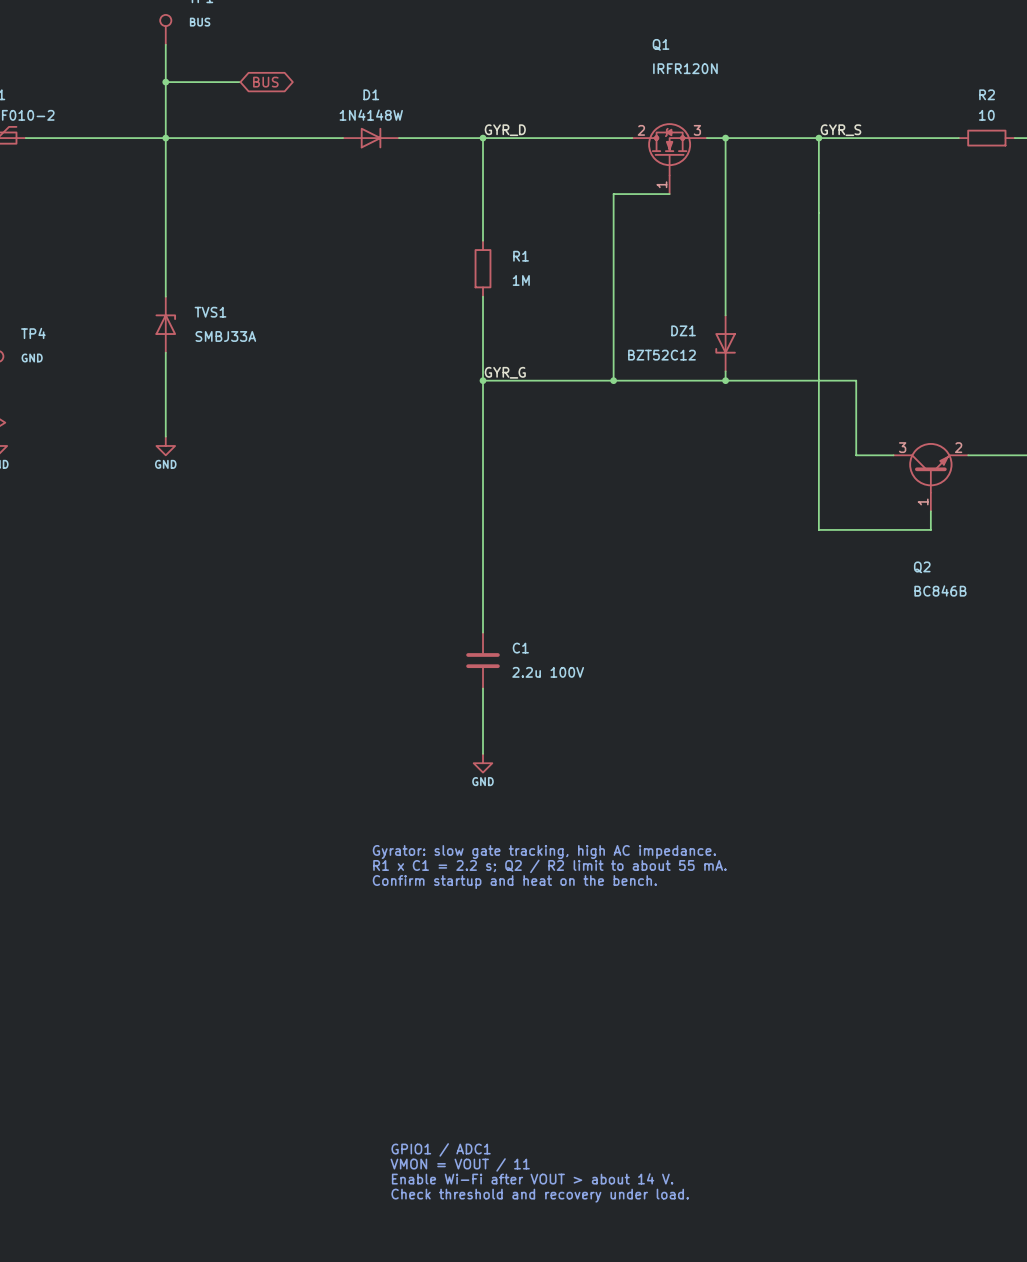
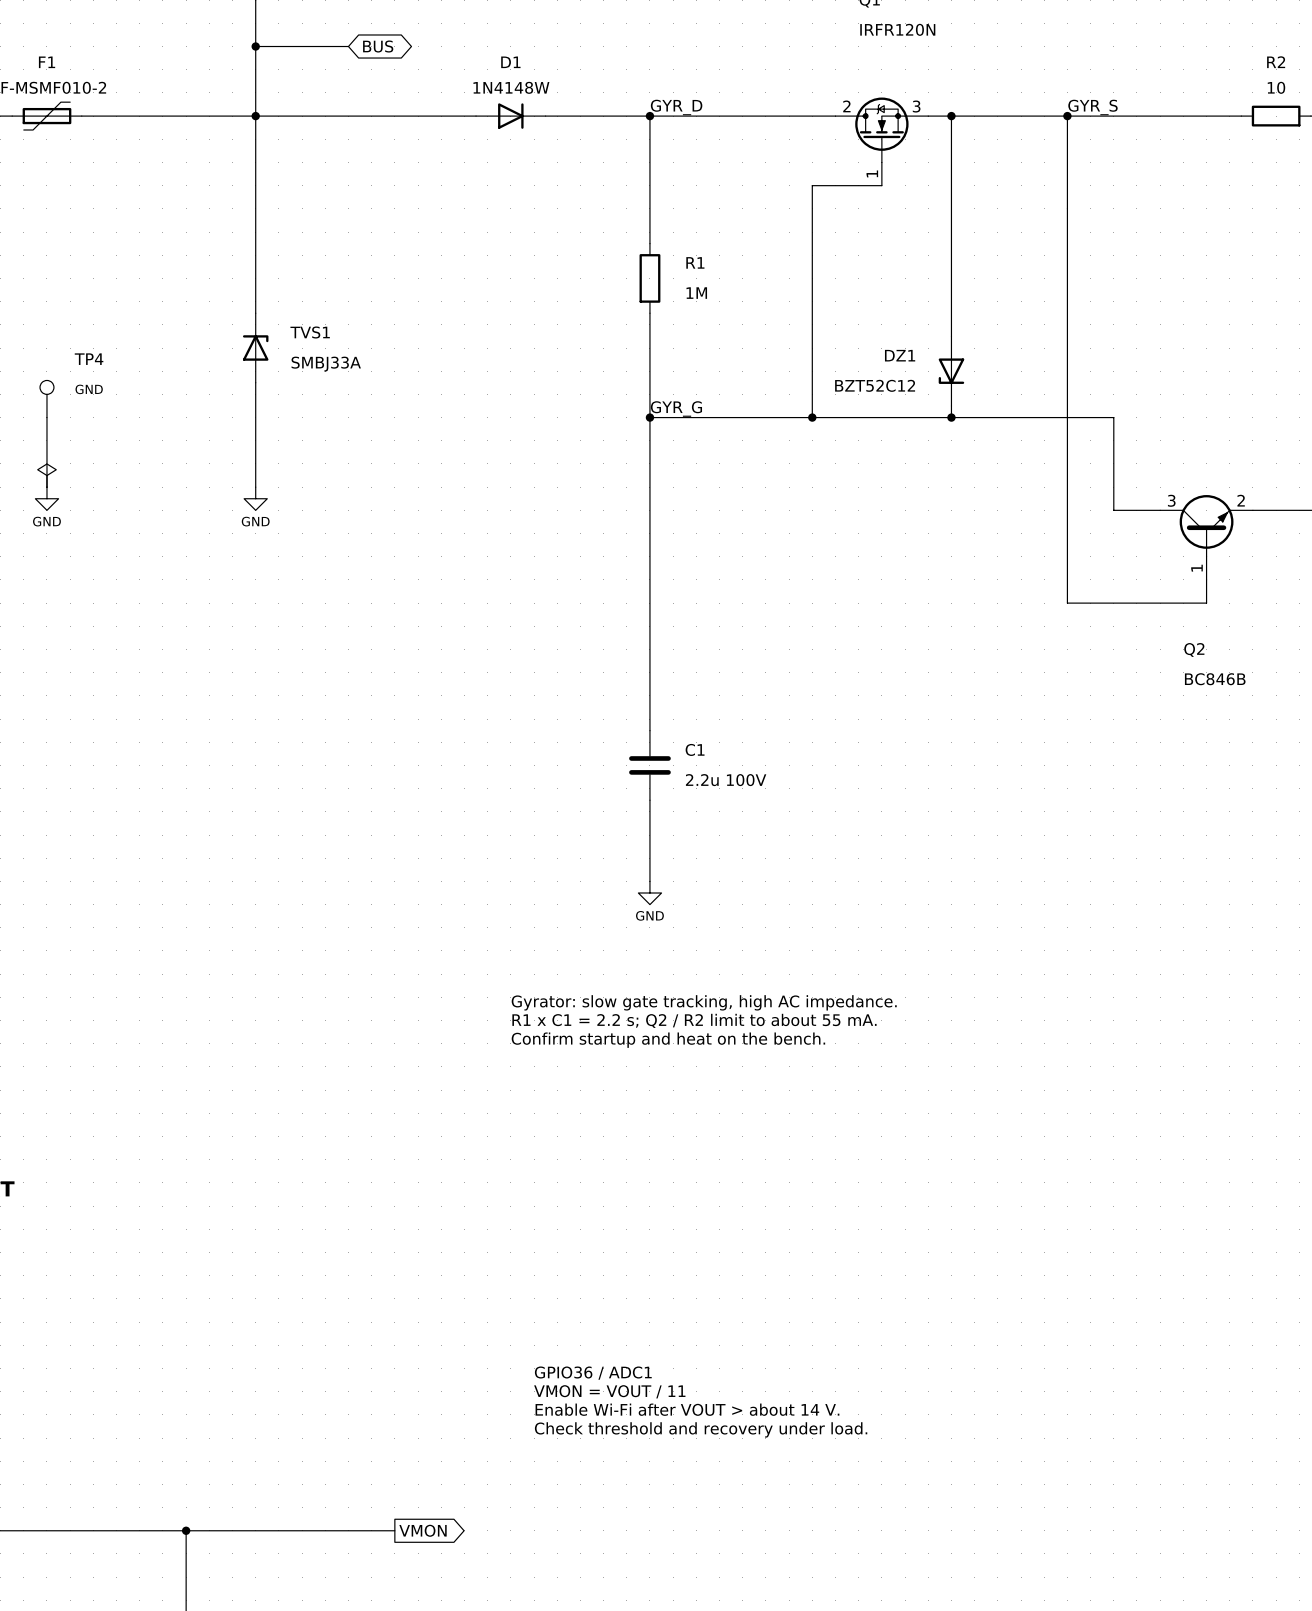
text: GPIO1 / ADC1 (441, 1149) -> GPIO36 / ADC1 (593, 1373)

